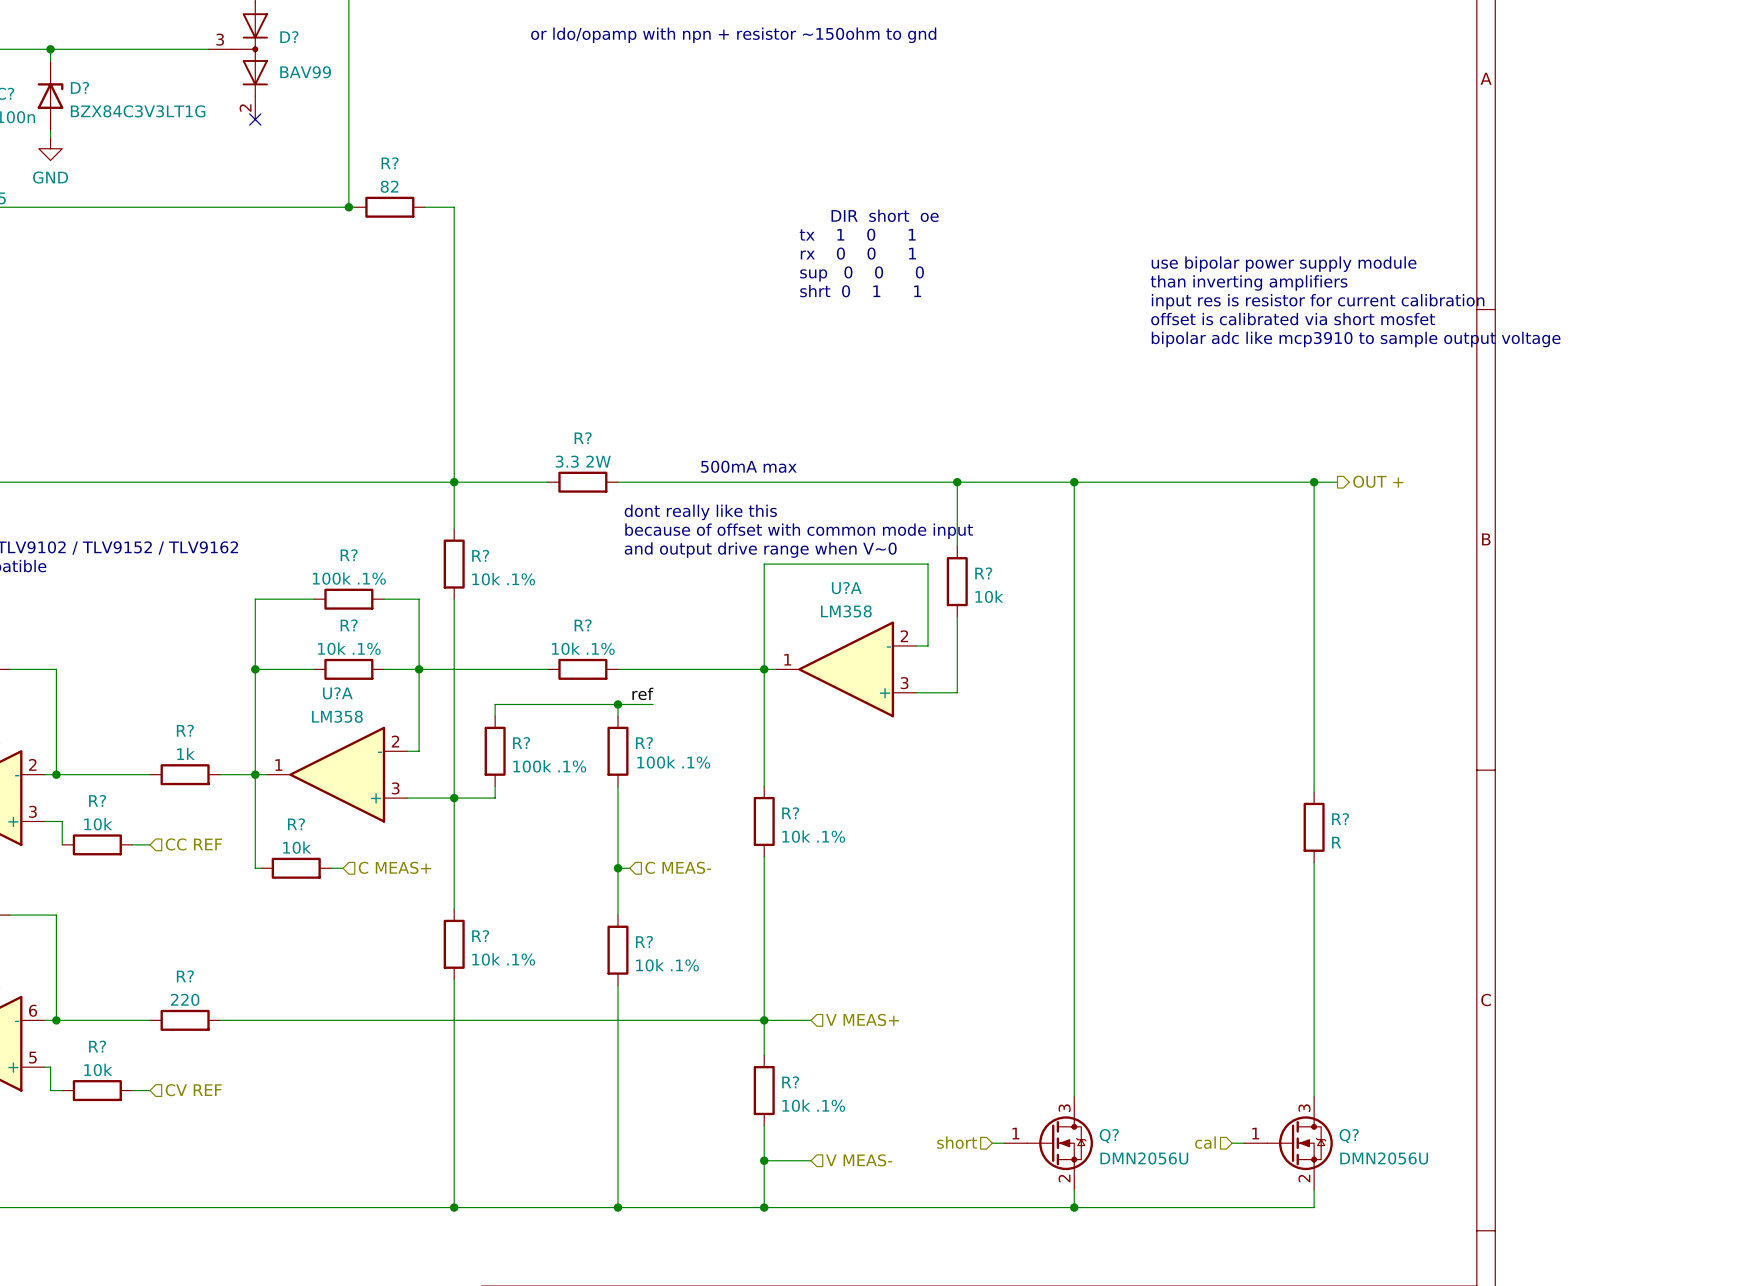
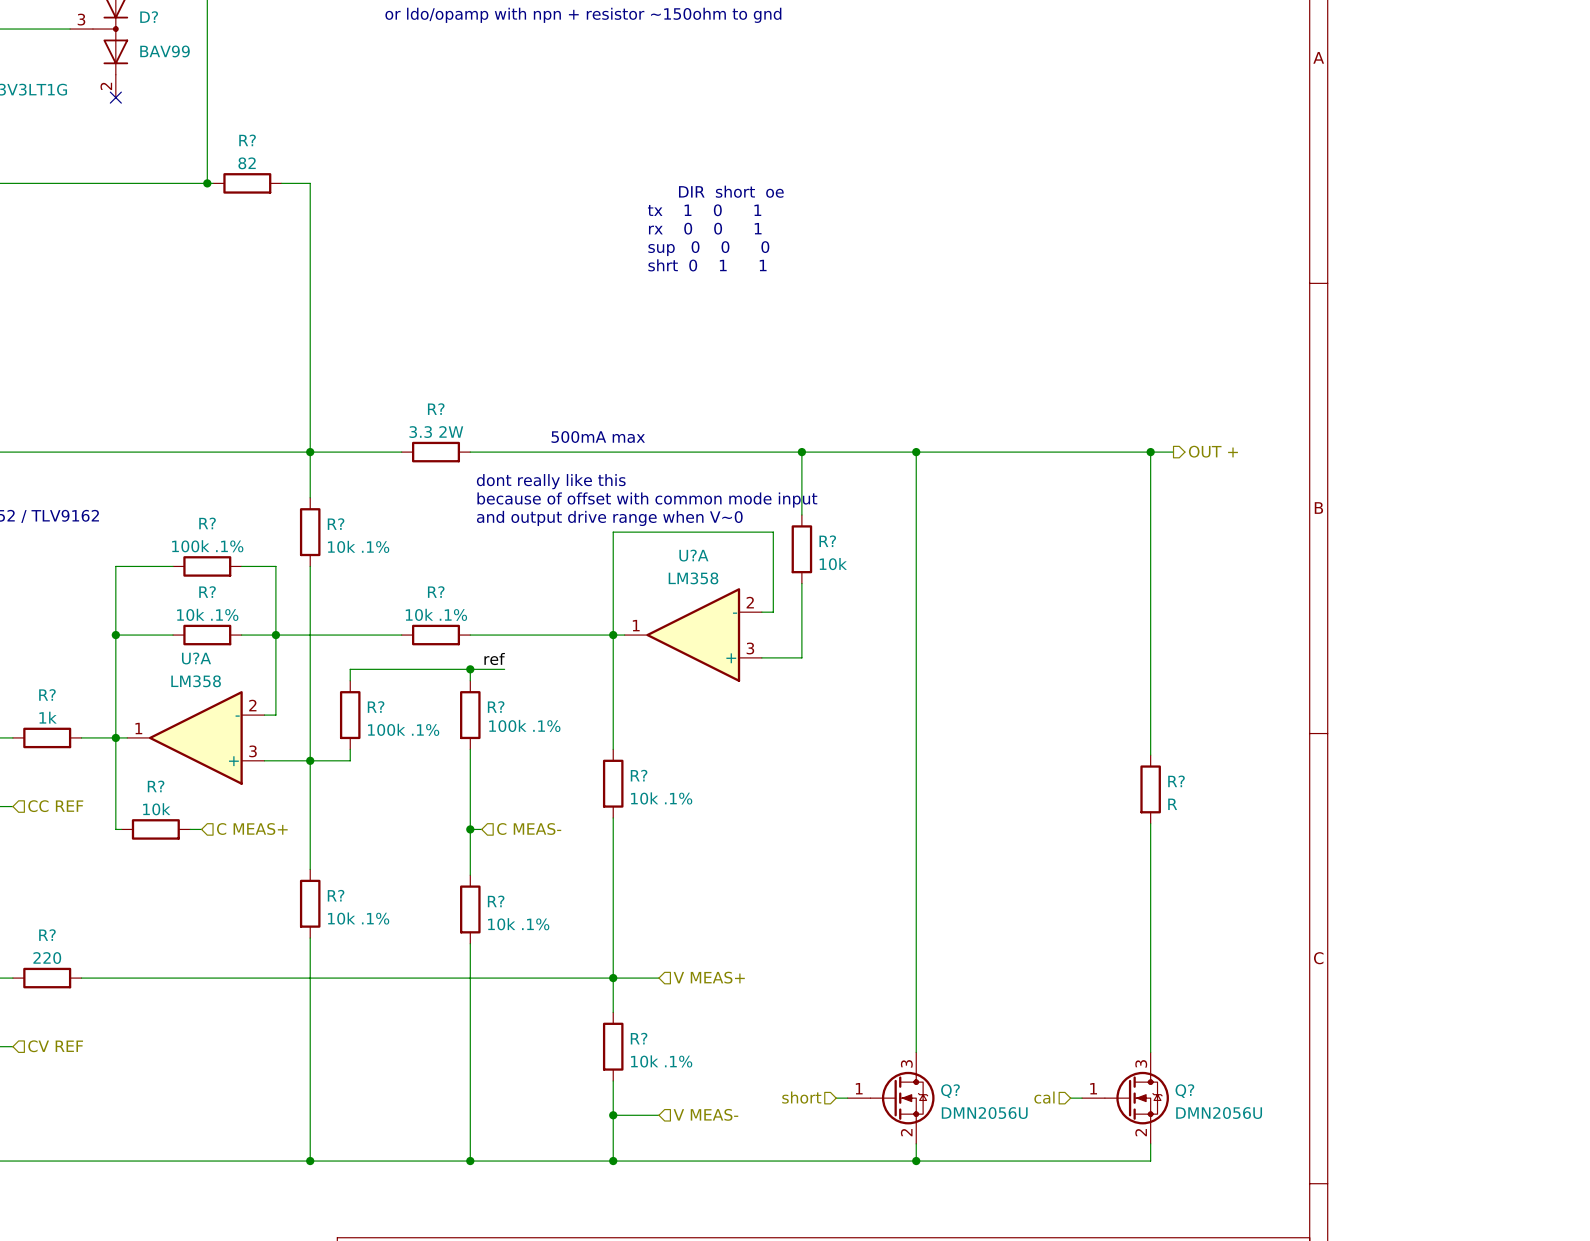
text: use bipolar power supply module (1284, 264) -> none
text: than inverting amplifiers (1249, 282) -> none
text: input res is resistor for current calibration (1318, 301) -> none
text: offset is calibrated via short mosfet (1293, 319) -> none
text: bipolar adc like mcp3910 to sample output voltage (1356, 339) -> none

